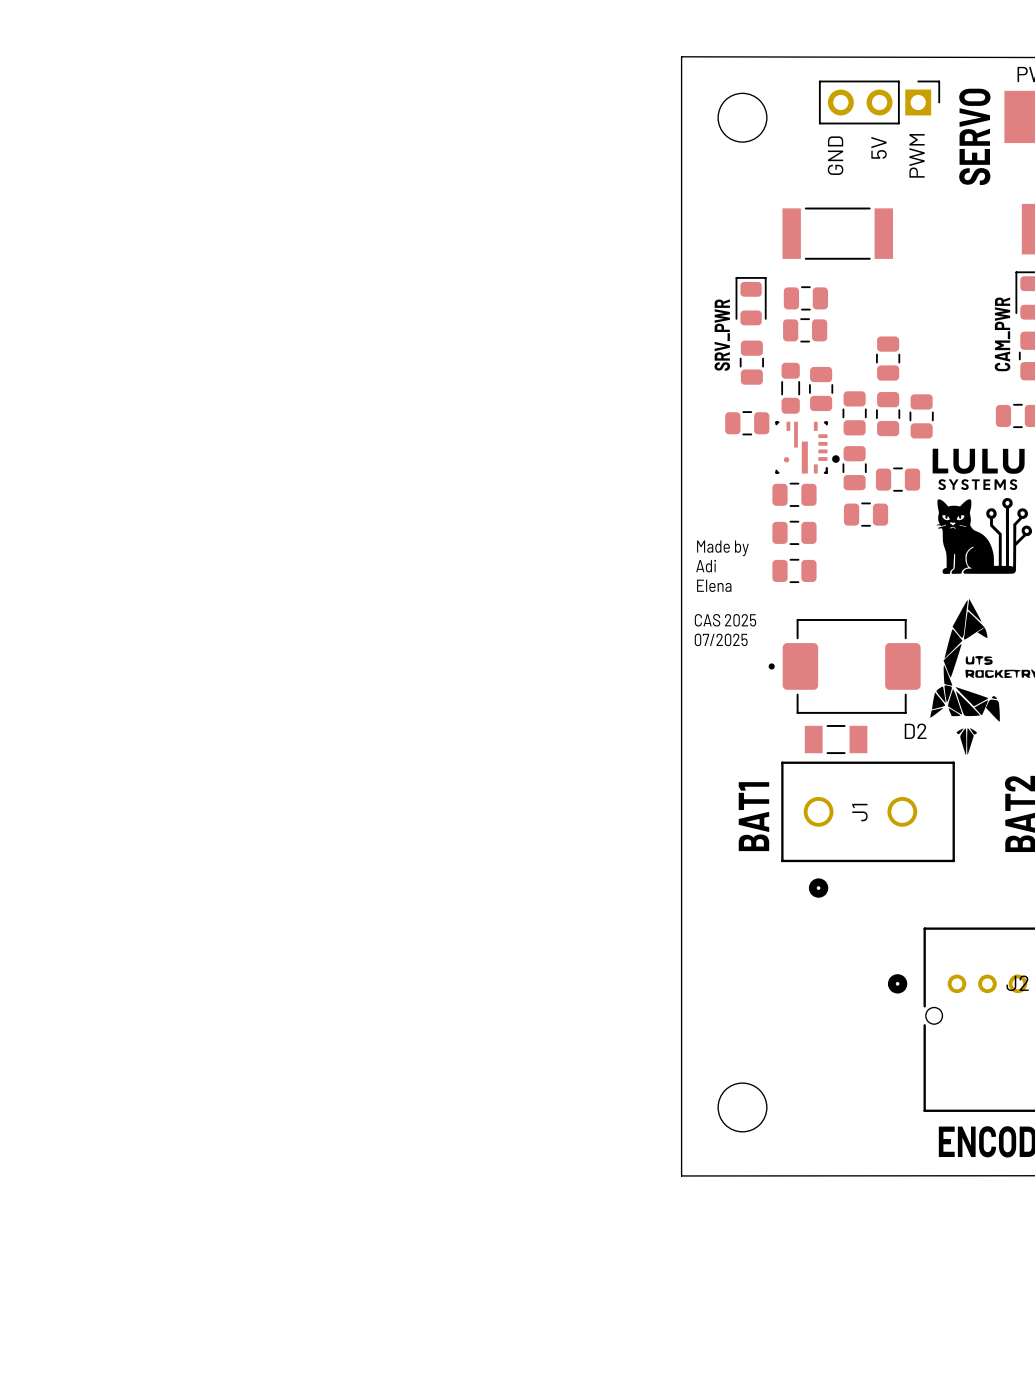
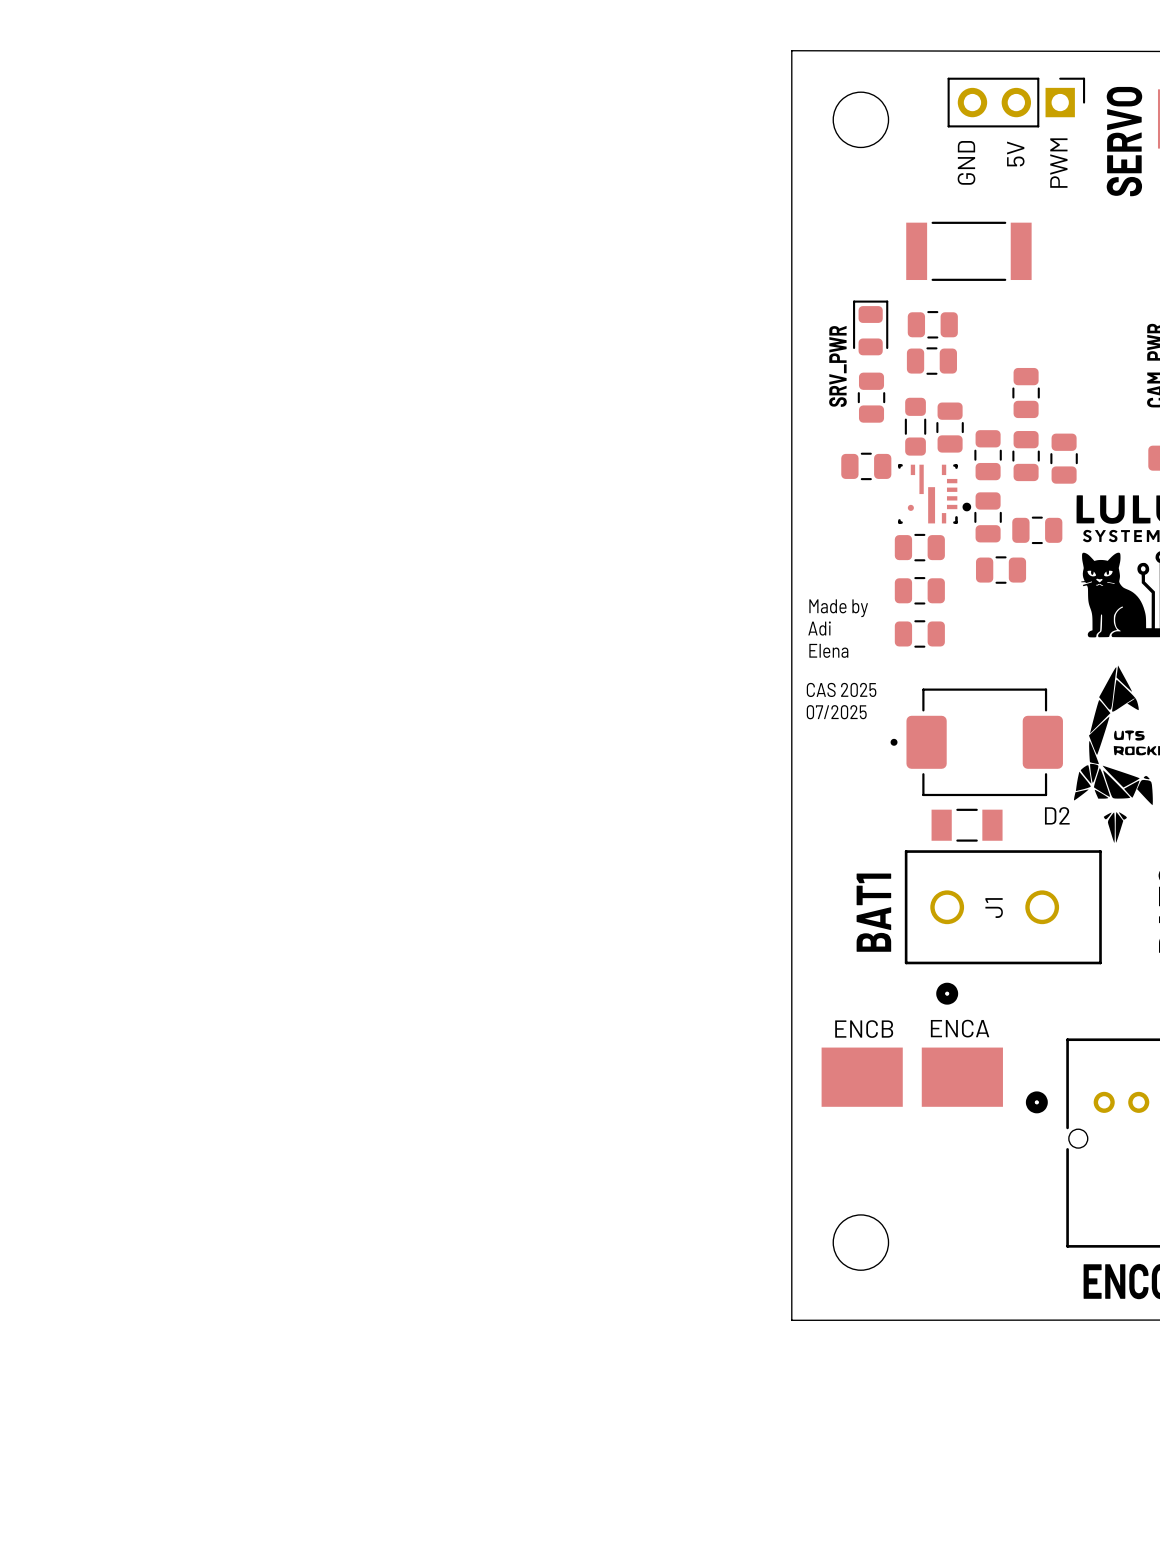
ENCB: none -> (862, 1077)
ENCA: none -> (962, 1077)

